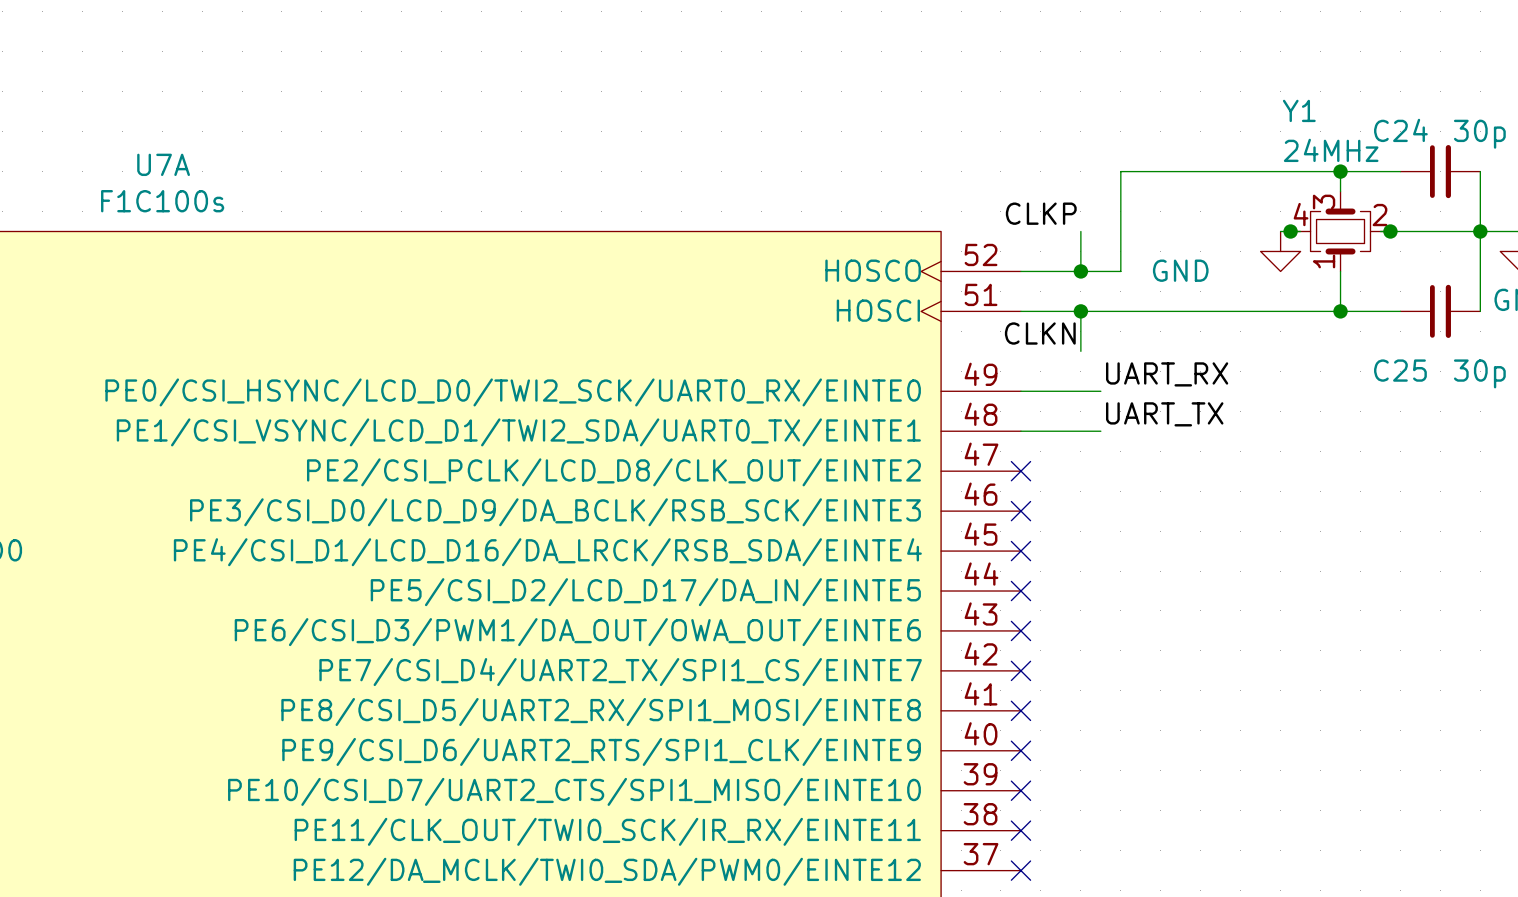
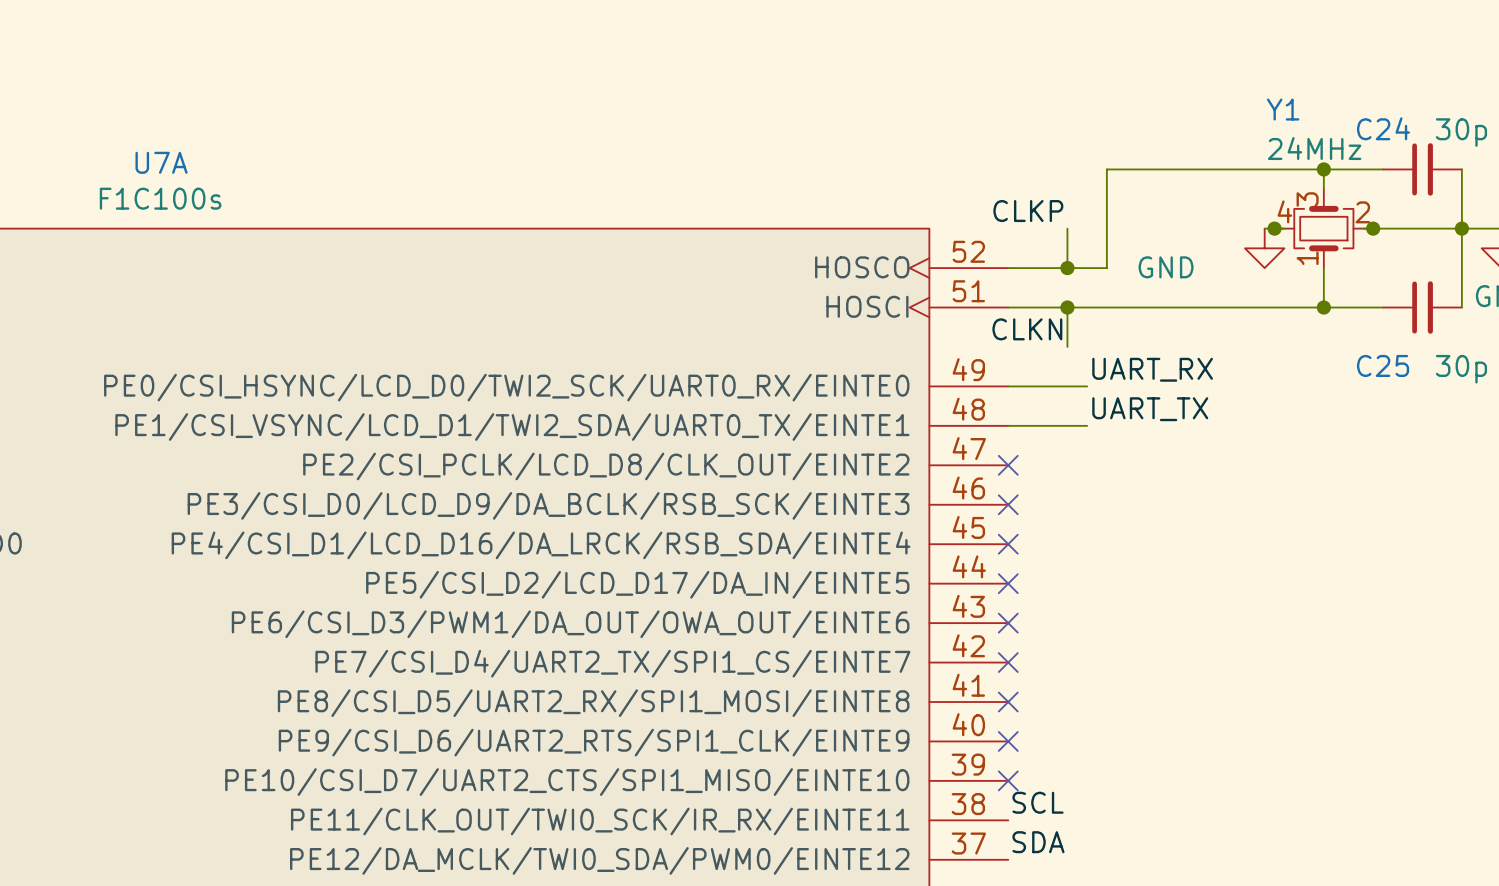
label: none -> SCL (1038, 802)
no-connect mark: (1020, 830) -> none
label: none -> SDA (1038, 842)
no-connect mark: (1020, 870) -> none

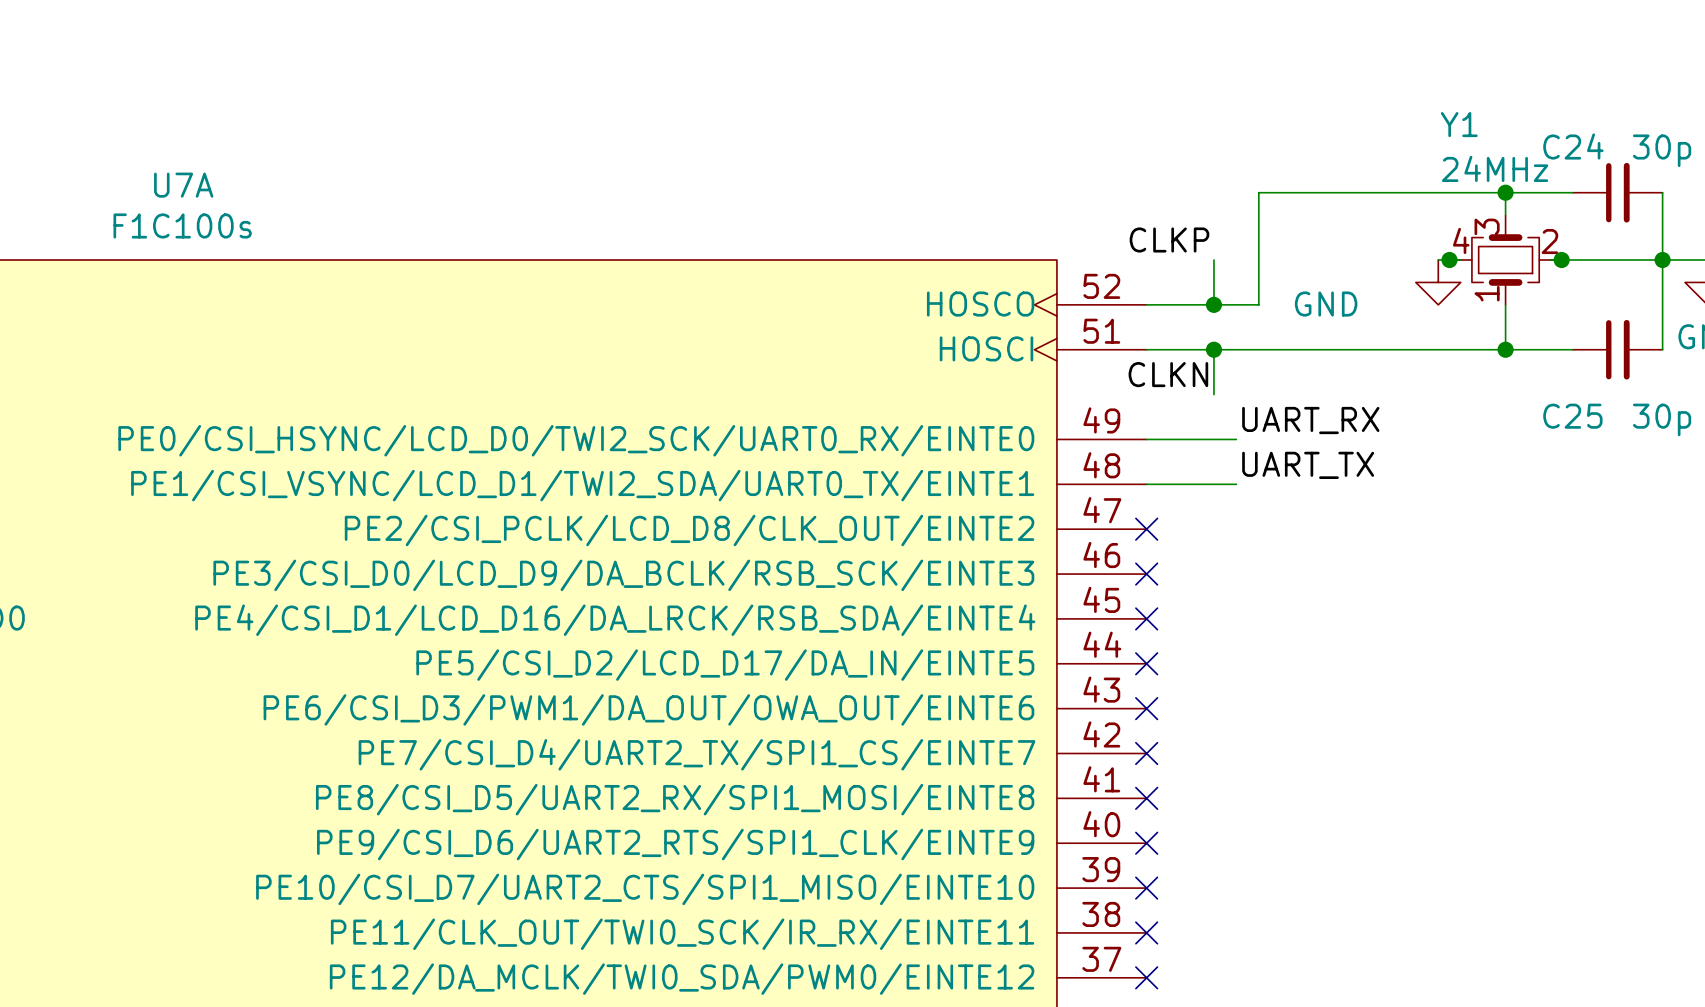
label: SCL (1038, 802) -> none
no-connect mark: none -> (1146, 932)
label: SDA (1038, 842) -> none
no-connect mark: none -> (1146, 977)

